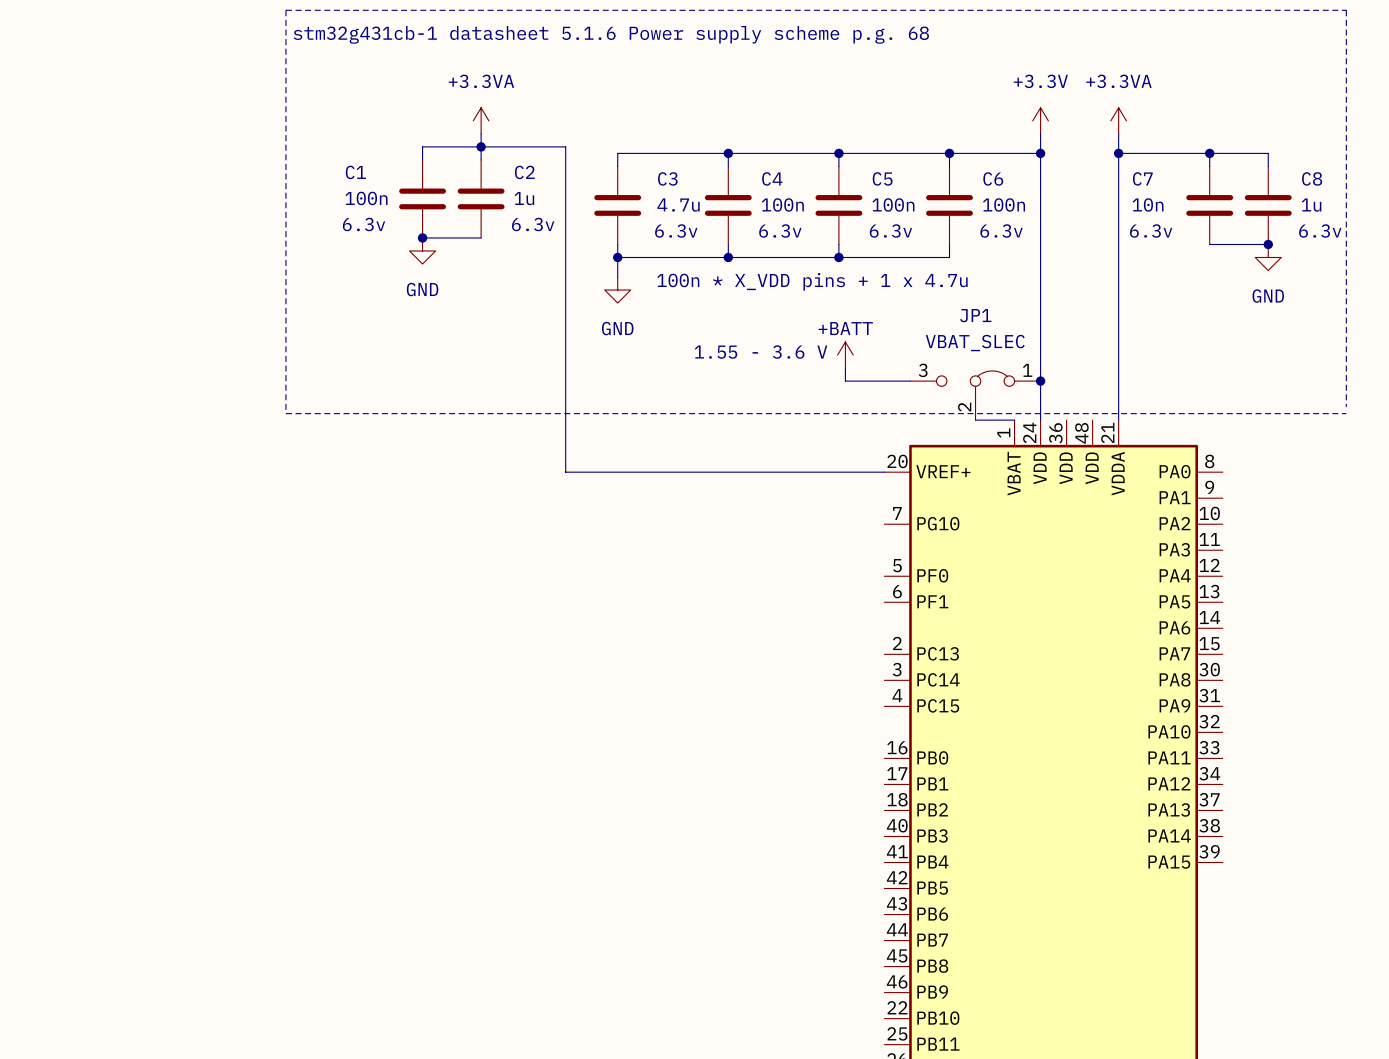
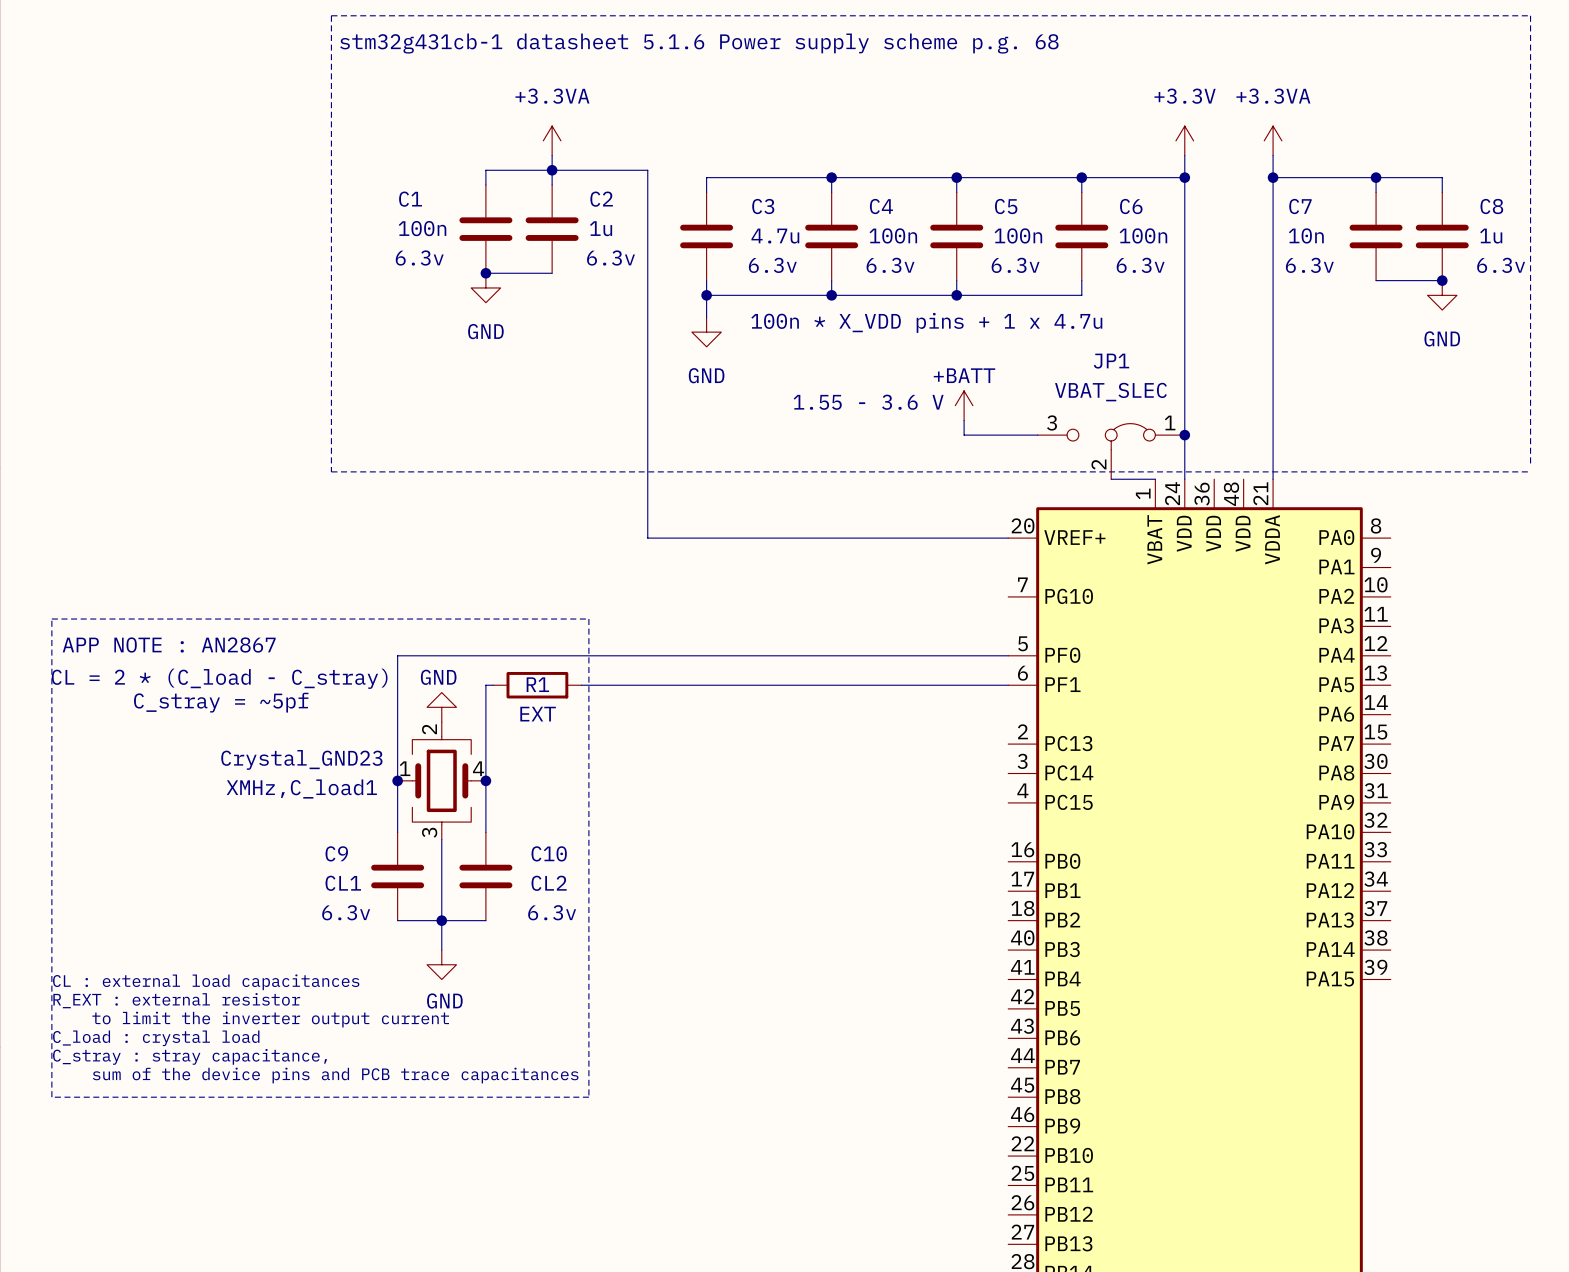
line: none -> (51, 619) (588, 619) (588, 1097) (51, 1097) (51, 619)
text: none -> APP NOTE : AN2867 (169, 645)
wire: none -> (1008, 655) (397, 655) (397, 832)
text: none -> CL = 2 * (C_load - C_stray) (219, 678)
wire: none -> (493, 685) (485, 685) (485, 832)
R1: none -> EXT (537, 685)
wire: none -> (581, 685) (1008, 685)
text: none -> C_stray = ~5pf (221, 702)
power symbol: none -> GND (441, 707)
junction: none -> (397, 780)
XMHz,C_load1: none -> Crystal_GND23 (441, 780)
junction: none -> (485, 780)
wire: none -> (441, 839) (441, 950)
C9: none -> CL1 (397, 876)
C10: none -> CL2 (485, 876)
wire: none -> (397, 920) (485, 920)
junction: none -> (441, 920)
power symbol: none -> GND (441, 964)
text: none -> CL : external load capacitances (206, 982)
text: none -> R_EXT : external resistor (176, 1000)
text: none -> to limit the inverter output current (270, 1019)
text: none -> C_load : crystal load (156, 1038)
text: none -> C_stray : stray capacitance, (190, 1056)
text: none -> sum of the device pins and PCB trace capacitances (335, 1075)

